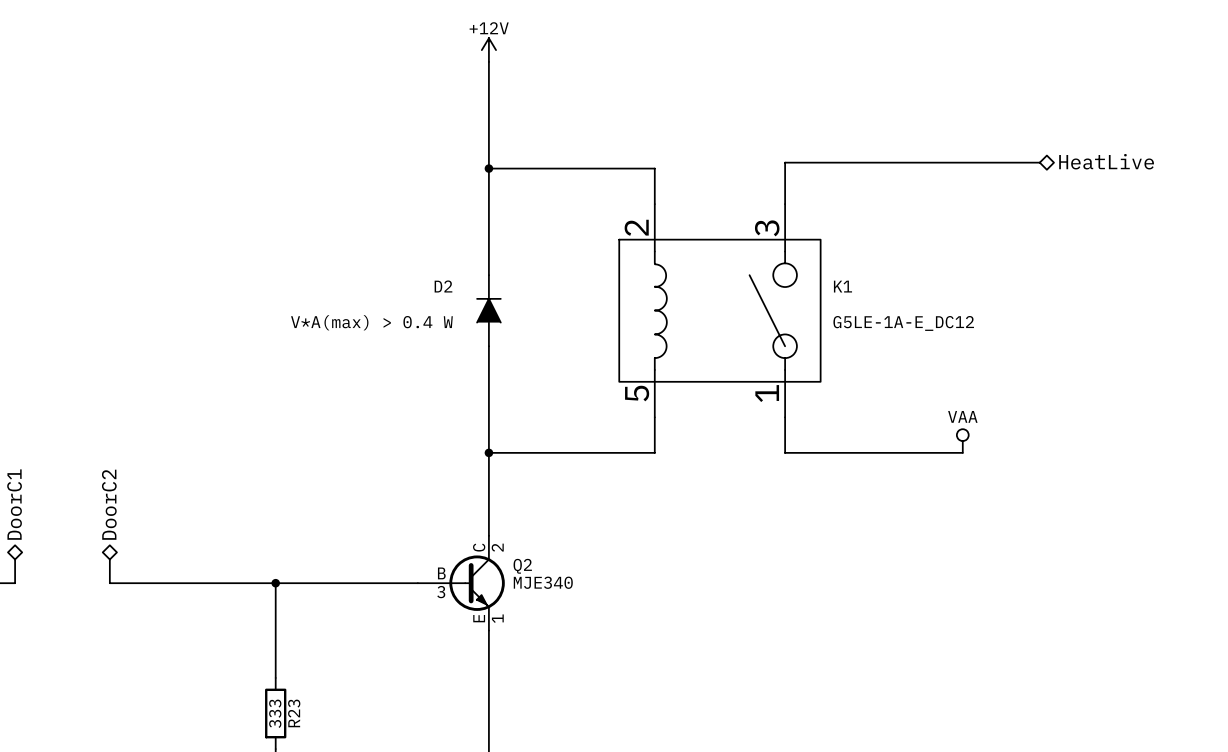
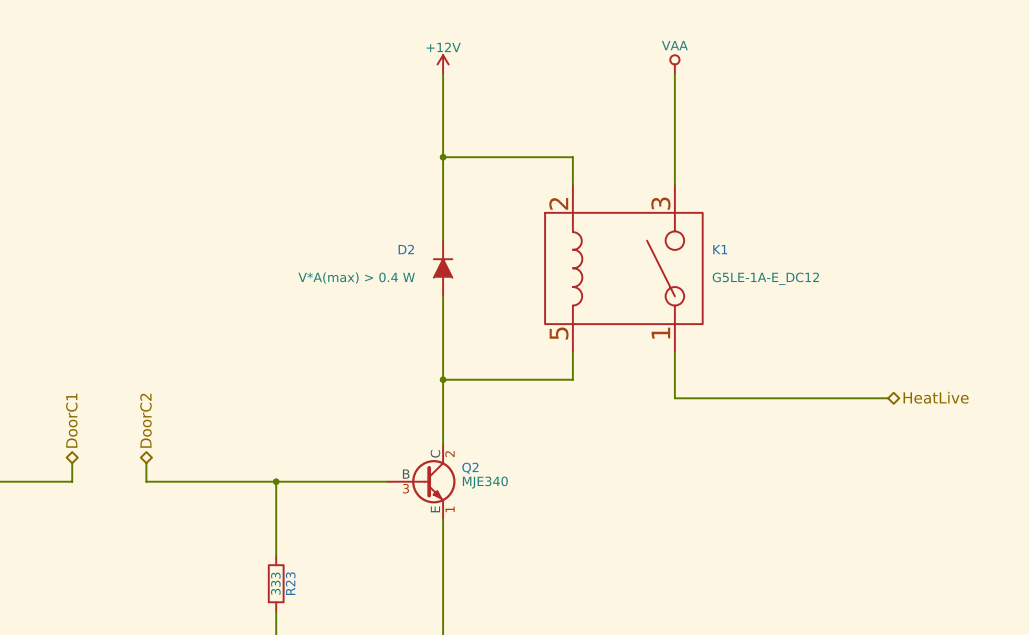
power symbol: none -> VAA (674, 64)
hierarchical label: HeatLive (1106, 161) -> none
wire: (785, 162) (1039, 162) -> (674, 152) (674, 73)
power symbol: VAA (962, 441) -> none
wire: (785, 452) (962, 452) -> (674, 379) (674, 398) (888, 398)
hierarchical label: none -> HeatLive (936, 397)

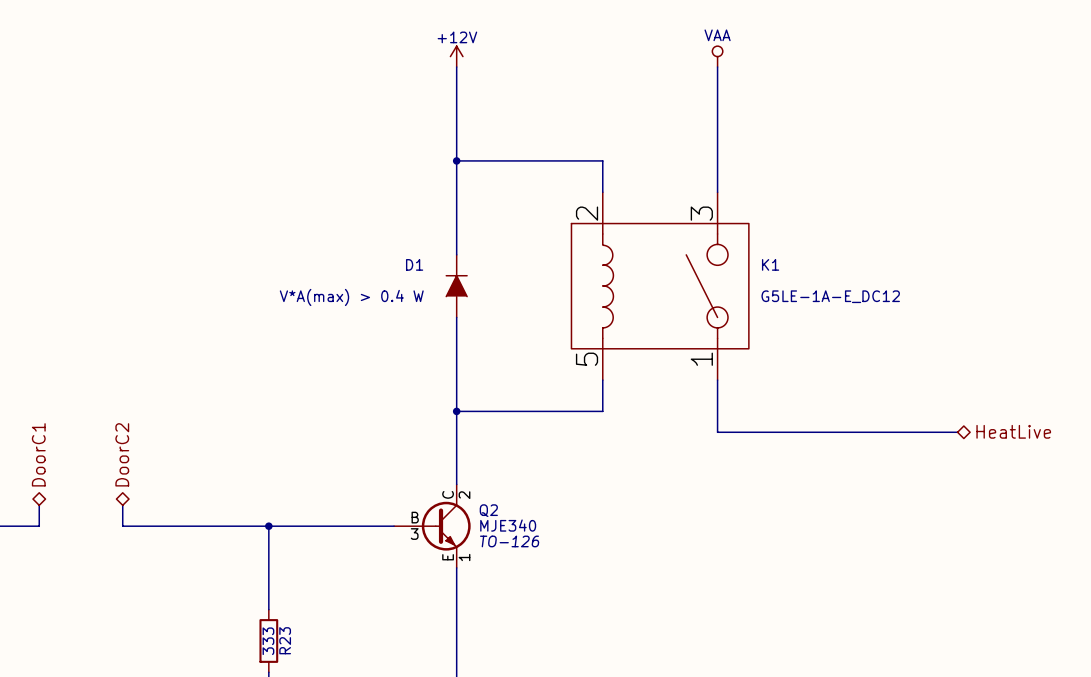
D2 name: D2 (406, 249) -> D1 (414, 264)
Q2 text: none -> TO-126 (509, 541)

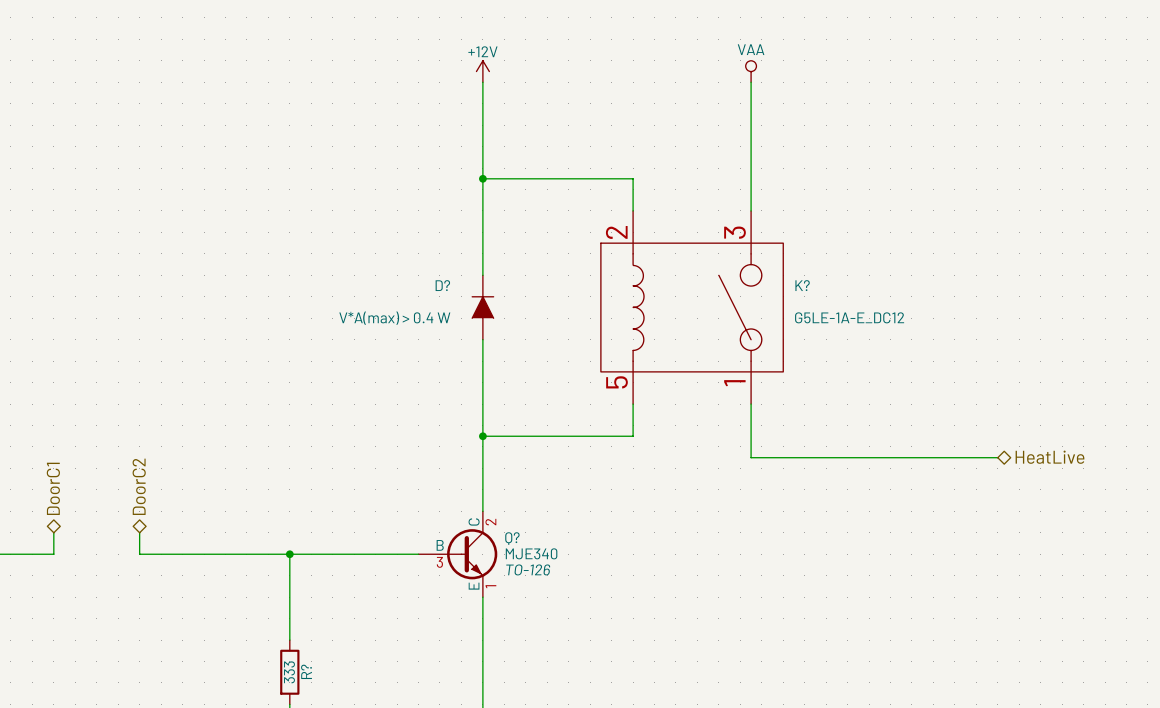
D1 name: D1 (414, 264) -> D? (442, 285)
K1 name: K1 (770, 264) -> K? (802, 285)
Q2 name: Q2 (488, 510) -> Q? (512, 538)
R23 name: R23 (285, 640) -> R? (306, 671)

